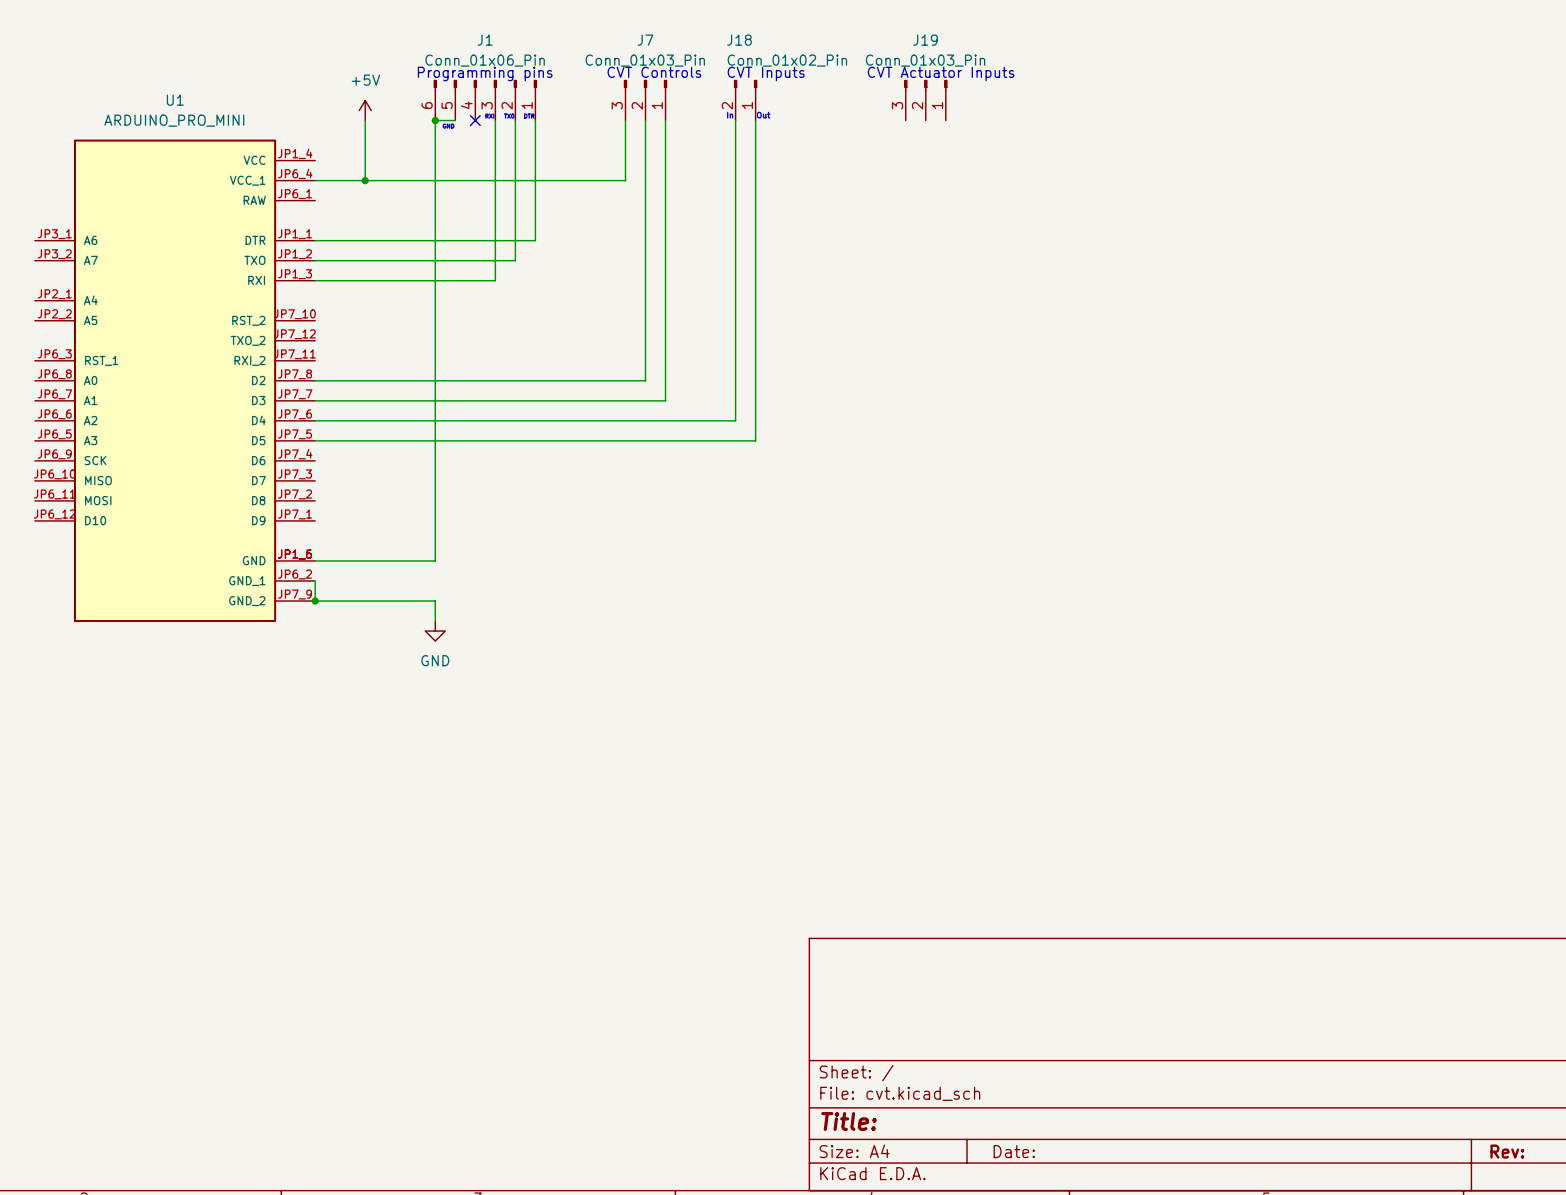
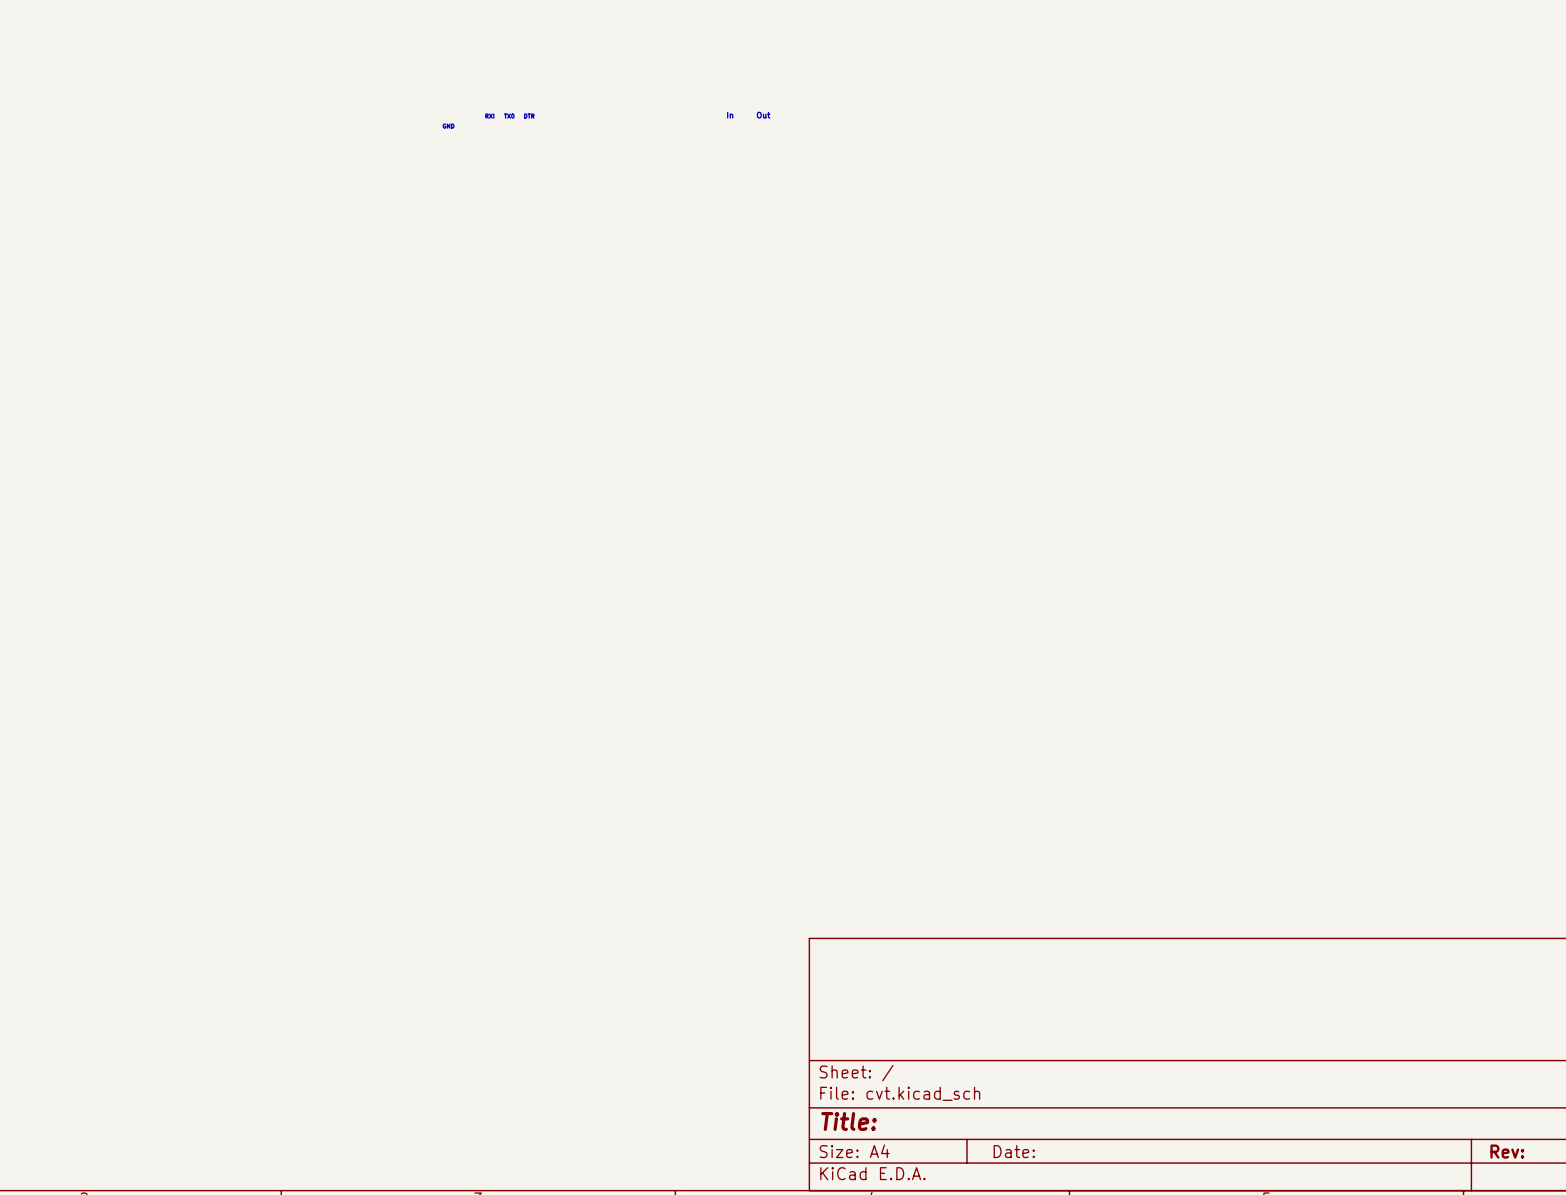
text: CVT Controls (654, 72) -> none
text: Programming pins (485, 73) -> none
text: CVT Inputs (766, 73) -> none
text: CVT Actuator Inputs (941, 73) -> none
J1: Conn_01x06_Pin (485, 100) -> none
J7: Conn_01x03_Pin (645, 100) -> none
J18: Conn_01x02_Pin (745, 100) -> none
J19: Conn_01x03_Pin (925, 100) -> none
power symbol: +5V (365, 110) -> none
wire: (365, 120) (365, 180) -> none
junction: (435, 120) -> none
wire: (455, 120) (435, 120) (435, 560) (315, 560) -> none
no-connect mark: (475, 120) -> none
wire: (495, 120) (495, 280) (315, 280) -> none
wire: (515, 120) (515, 260) (315, 260) -> none
wire: (535, 120) (535, 240) (315, 240) -> none
wire: (625, 120) (625, 180) (315, 180) -> none
wire: (645, 120) (645, 380) (315, 380) -> none
wire: (665, 120) (665, 400) (315, 400) -> none
wire: (735, 120) (735, 420) (315, 420) -> none
wire: (755, 120) (755, 440) (315, 440) -> none
junction: (365, 180) -> none
U1: ARDUINO_PRO_MINI (175, 380) -> none
wire: (315, 581) (315, 601) (435, 601) (435, 621) -> none
junction: (315, 601) -> none
power symbol: GND (435, 631) -> none

